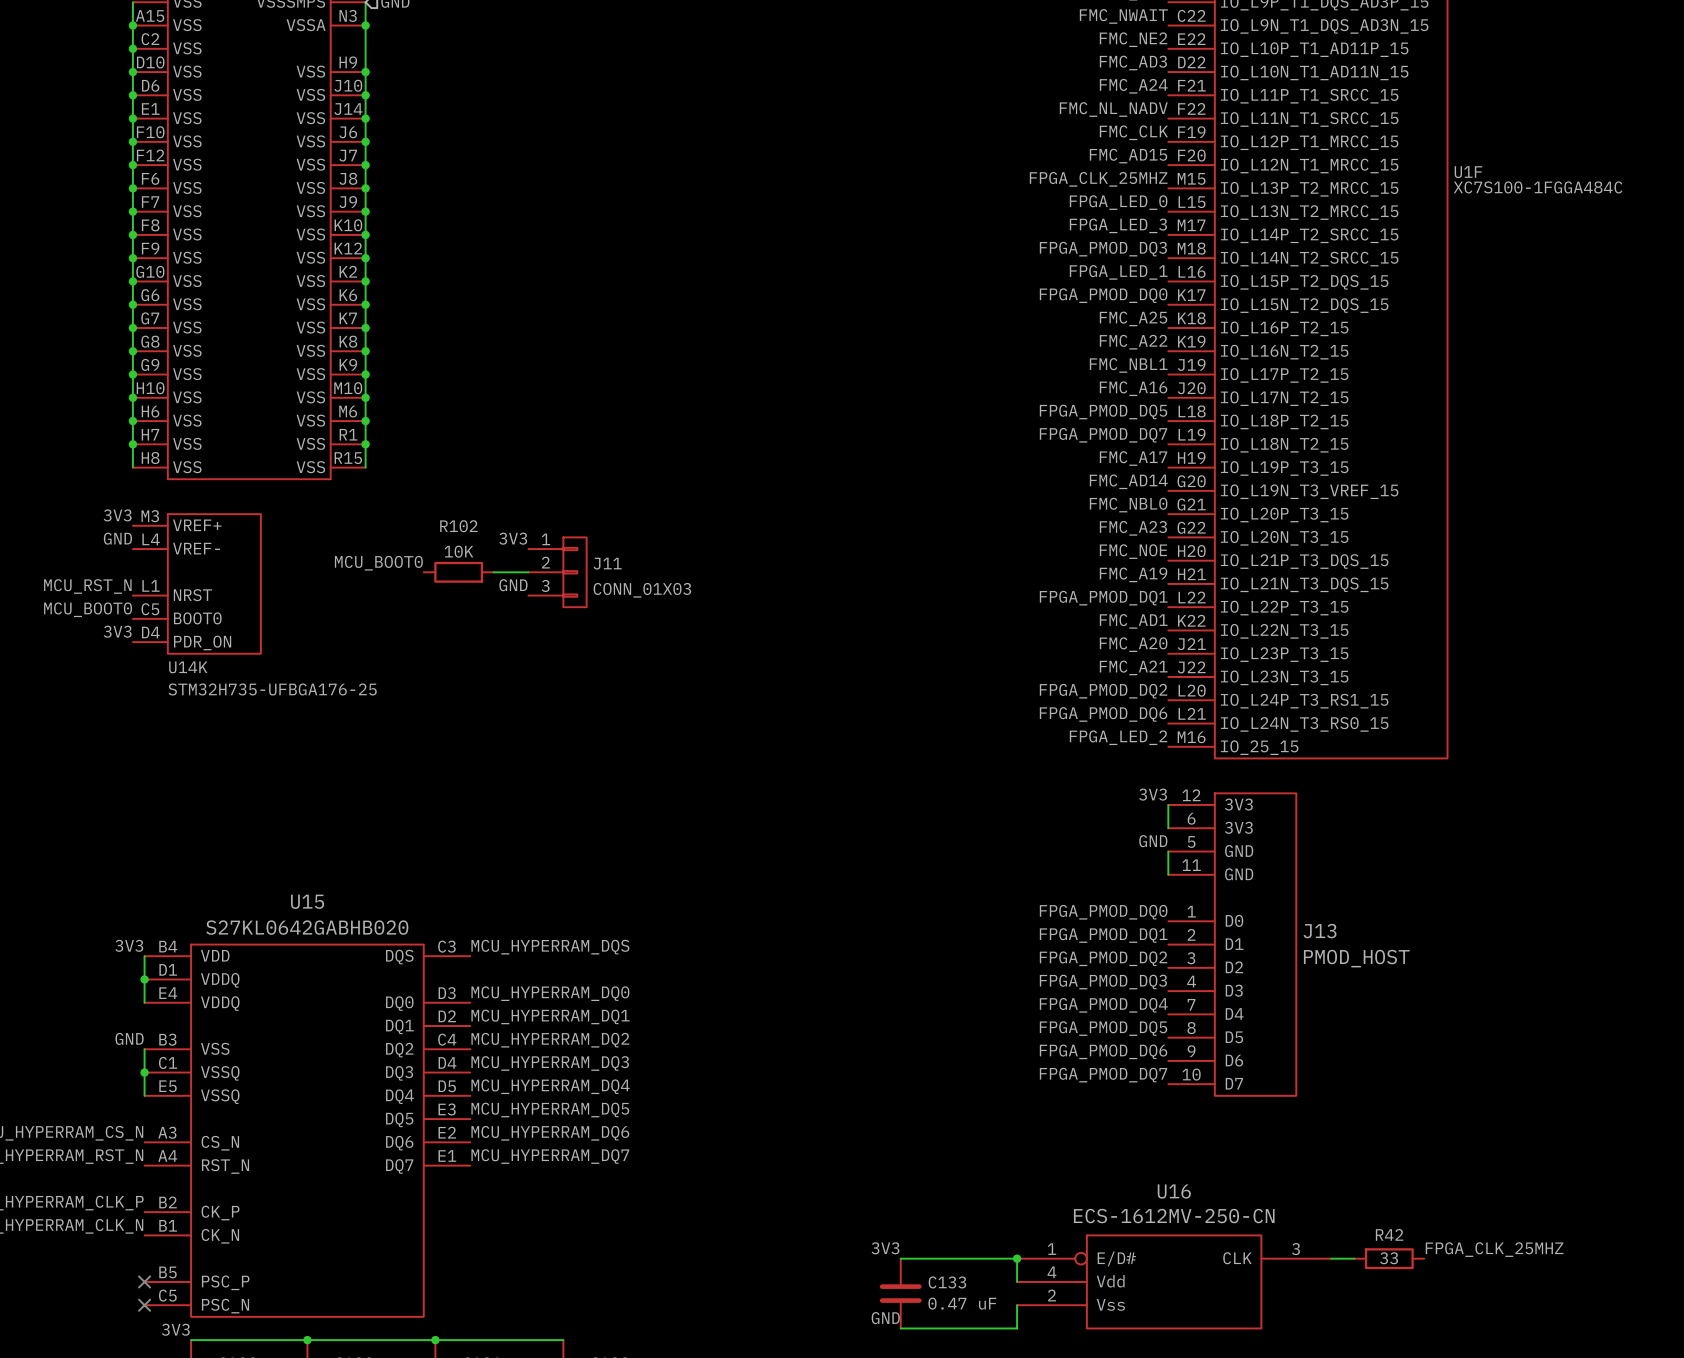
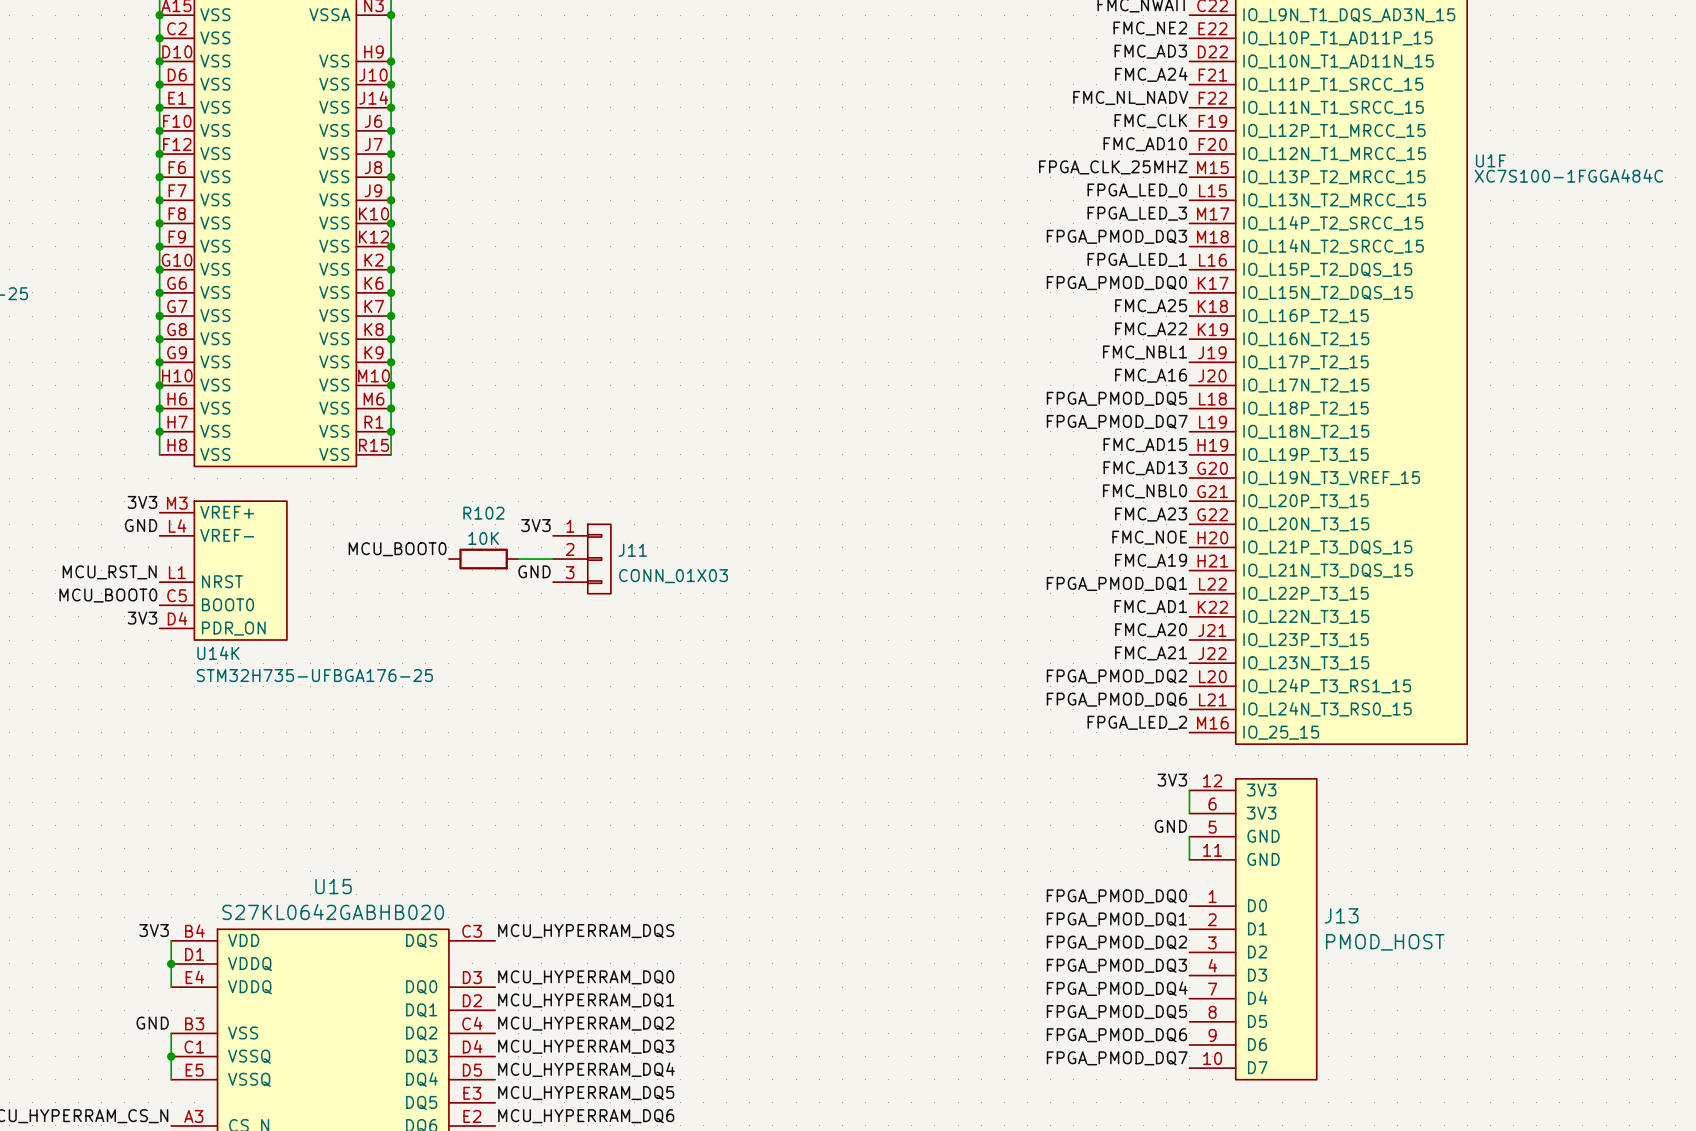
label: FMC_AD15 (1128, 156) -> FMC_AD10 (1145, 144)
label: FMC_A17 (1133, 458) -> FMC_AD15 (1145, 445)
label: FMC_AD14 (1128, 481) -> FMC_AD13 (1145, 468)

